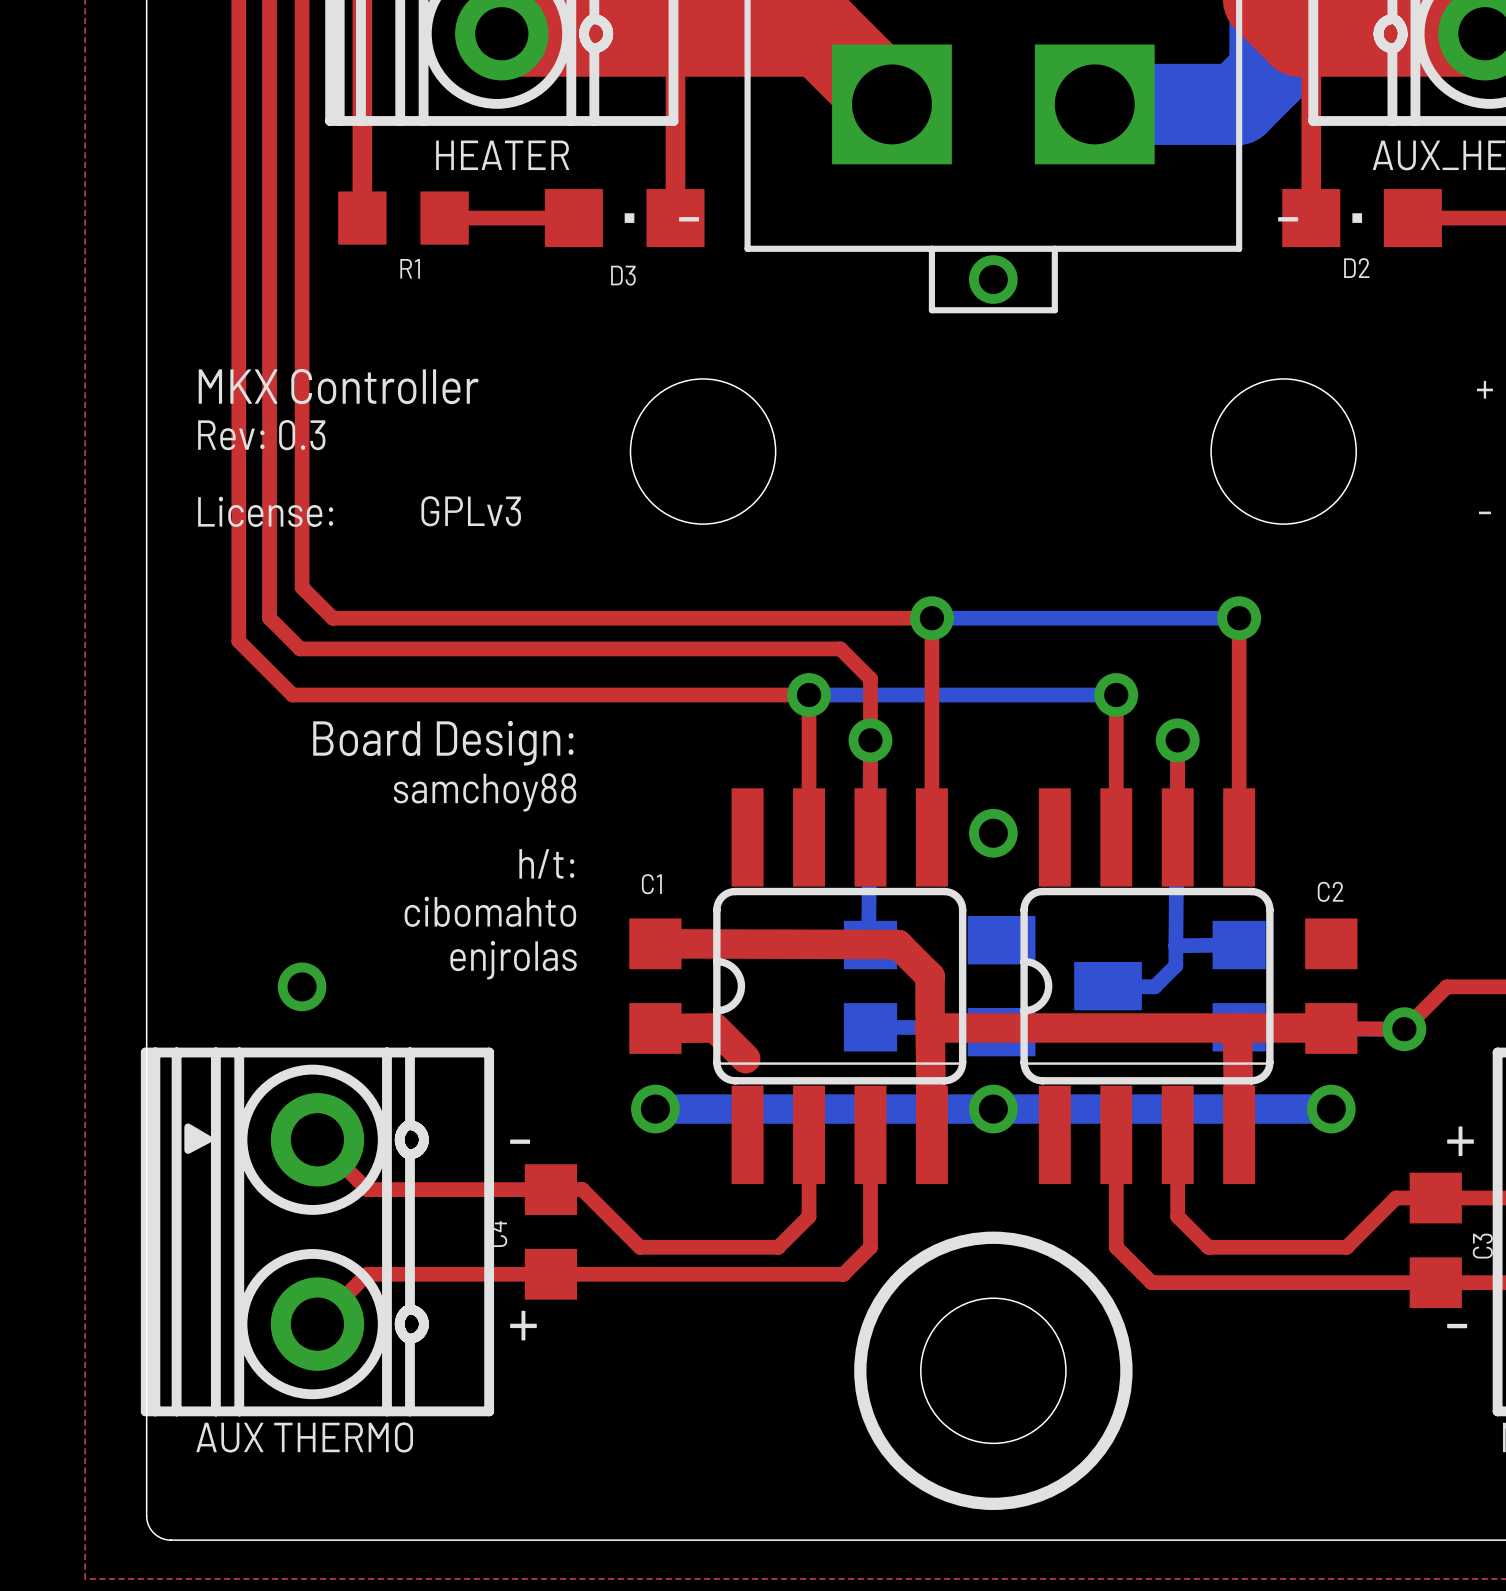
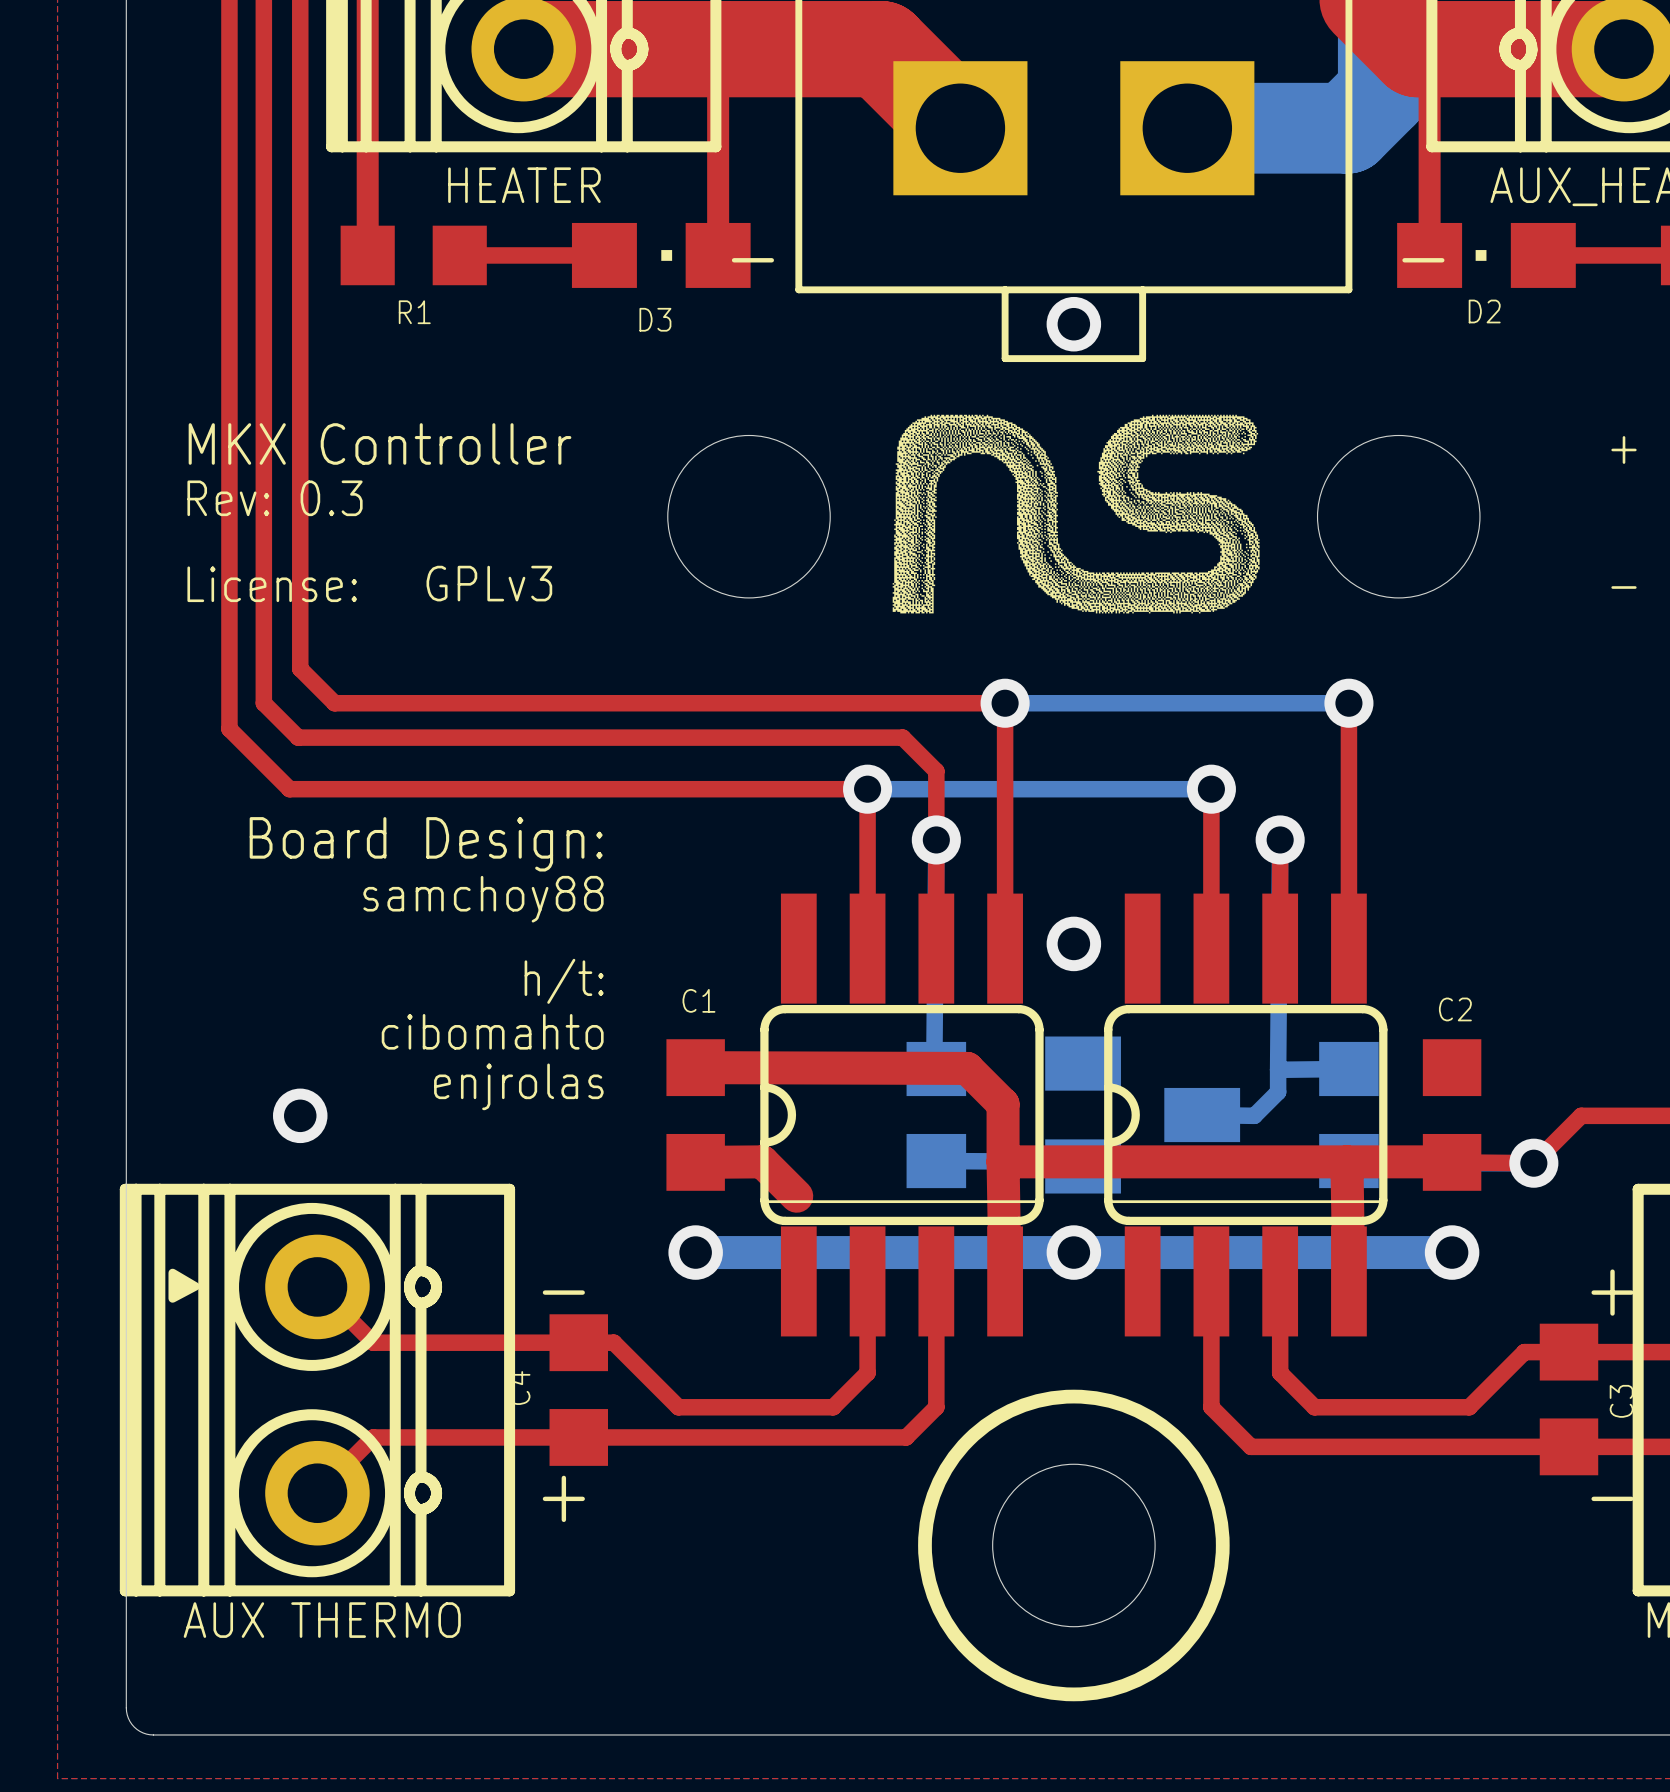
drawing: none -> [892, 414, 1260, 614]

